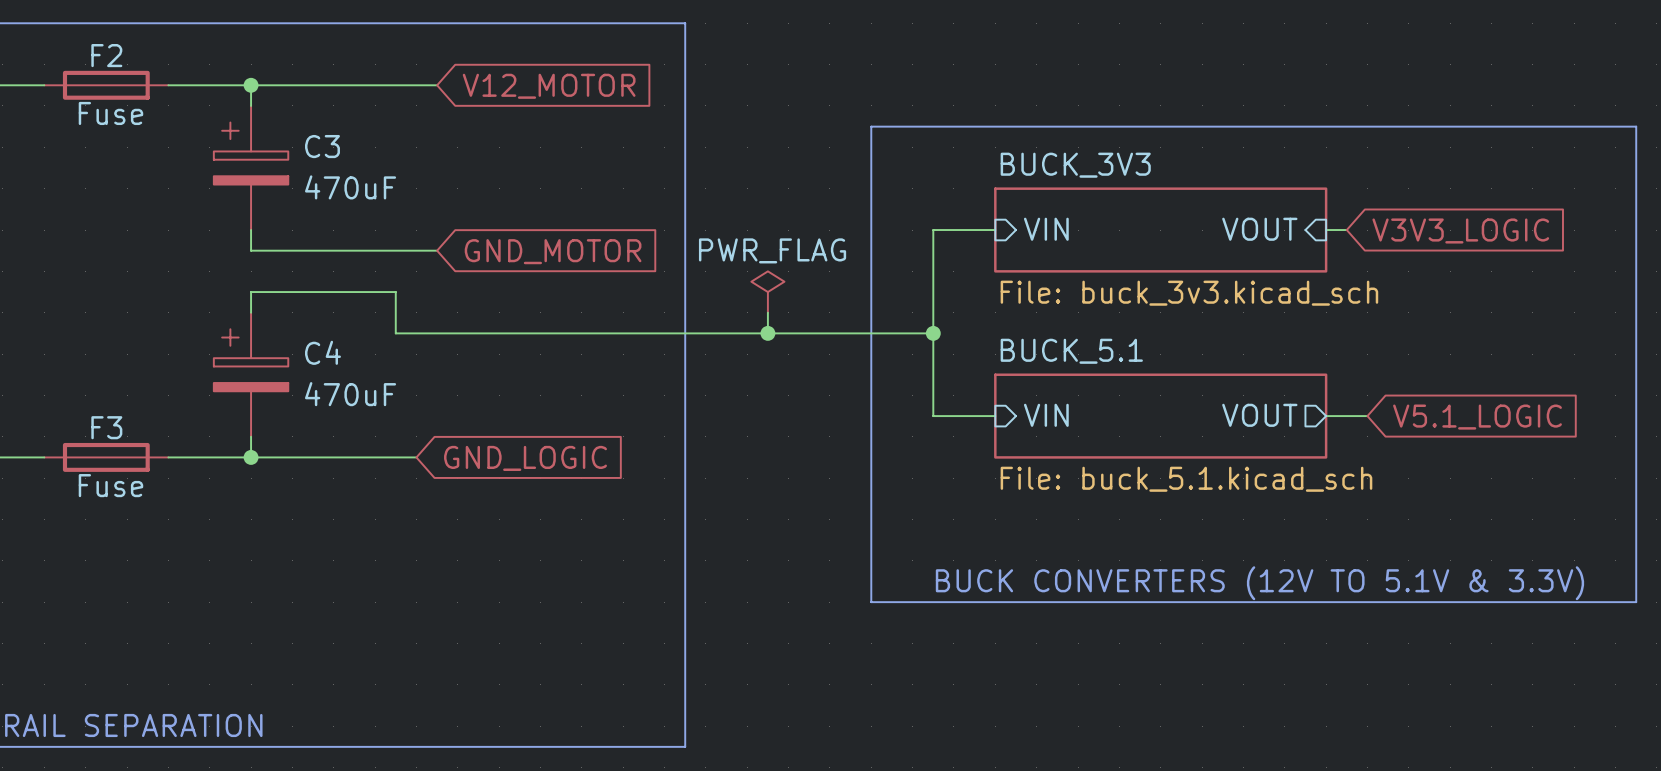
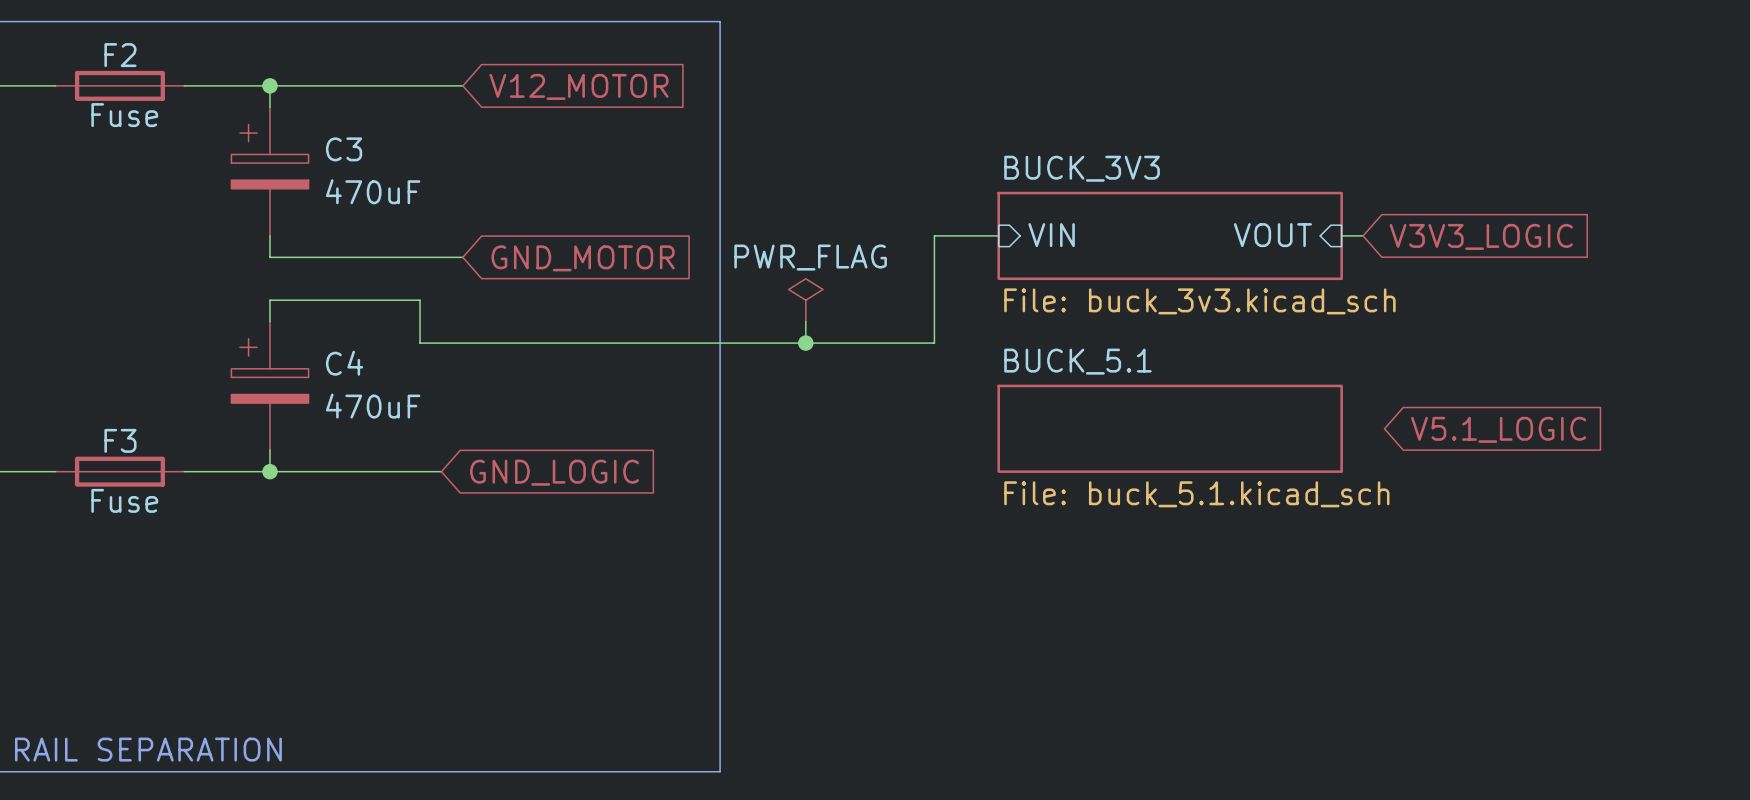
line: (871, 126) (1636, 126) (1636, 602) (871, 602) (871, 126) -> none
sheet pin position: VIN (1046, 229) -> VIN (1051, 235)
sheet pin position: VOUT (1259, 229) -> VOUT (1272, 235)
wire: (933, 230) (933, 416) (995, 416) -> none
wire: (953, 230) (995, 230) -> none
sheet BUCK_3V3 position: (1160, 230) -> (1170, 235)
wire: (1326, 230) (1346, 230) -> (1341, 235) (1363, 235)
global label position: V3V3_LOGIC (1460, 230) -> V3V3_LOGIC (1481, 236)
wire: (891, 333) (933, 333) -> (934, 343) (934, 235) (977, 235)
junction: (933, 333) -> none
sheet pin: VIN (1046, 415) -> none
sheet pin: VOUT (1259, 415) -> none
sheet BUCK_5.1 position: (1160, 416) -> (1170, 428)
wire: (1326, 416) (1367, 416) -> none
global label position: V5.1_LOGIC (1477, 417) -> V5.1_LOGIC (1498, 429)
text: BUCK CONVERTERS (12V TO 5.1V & 3.3V) (1259, 583) -> none

